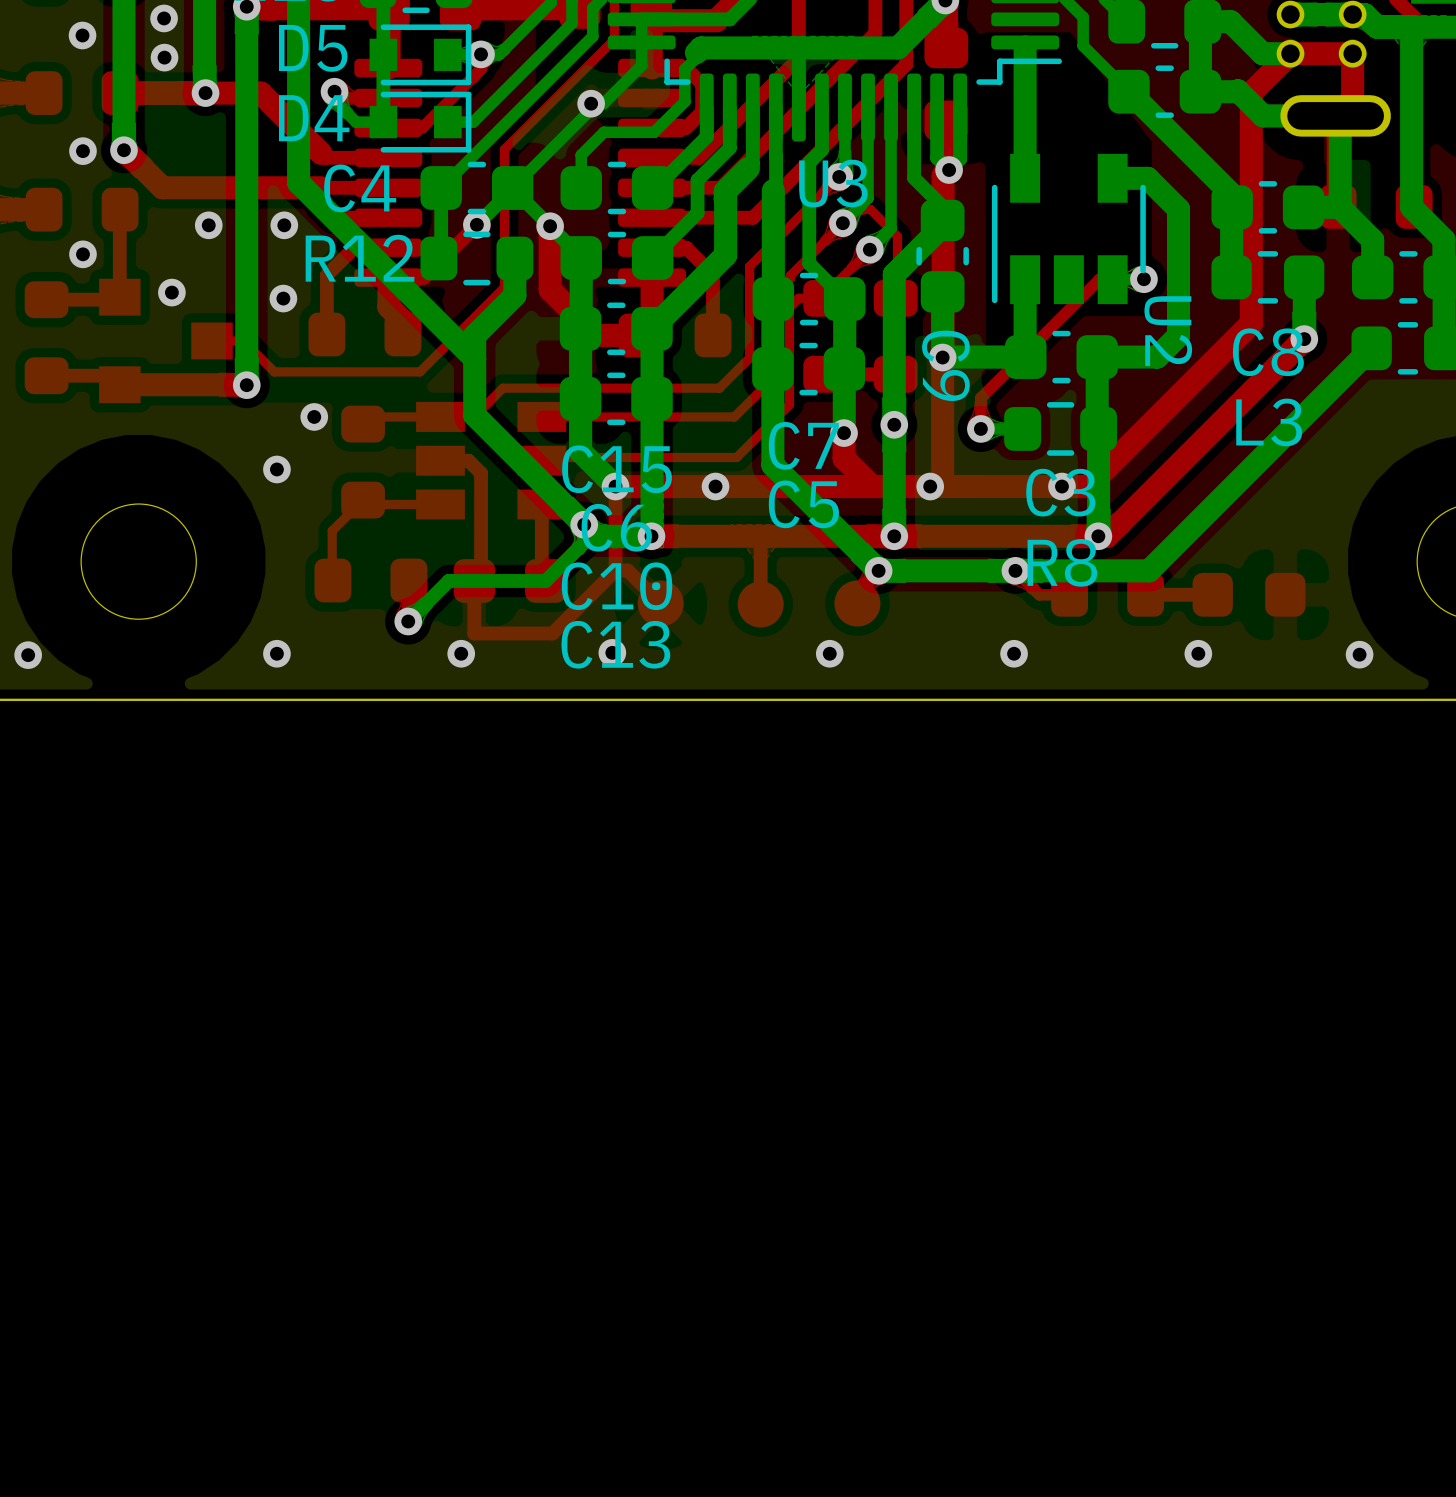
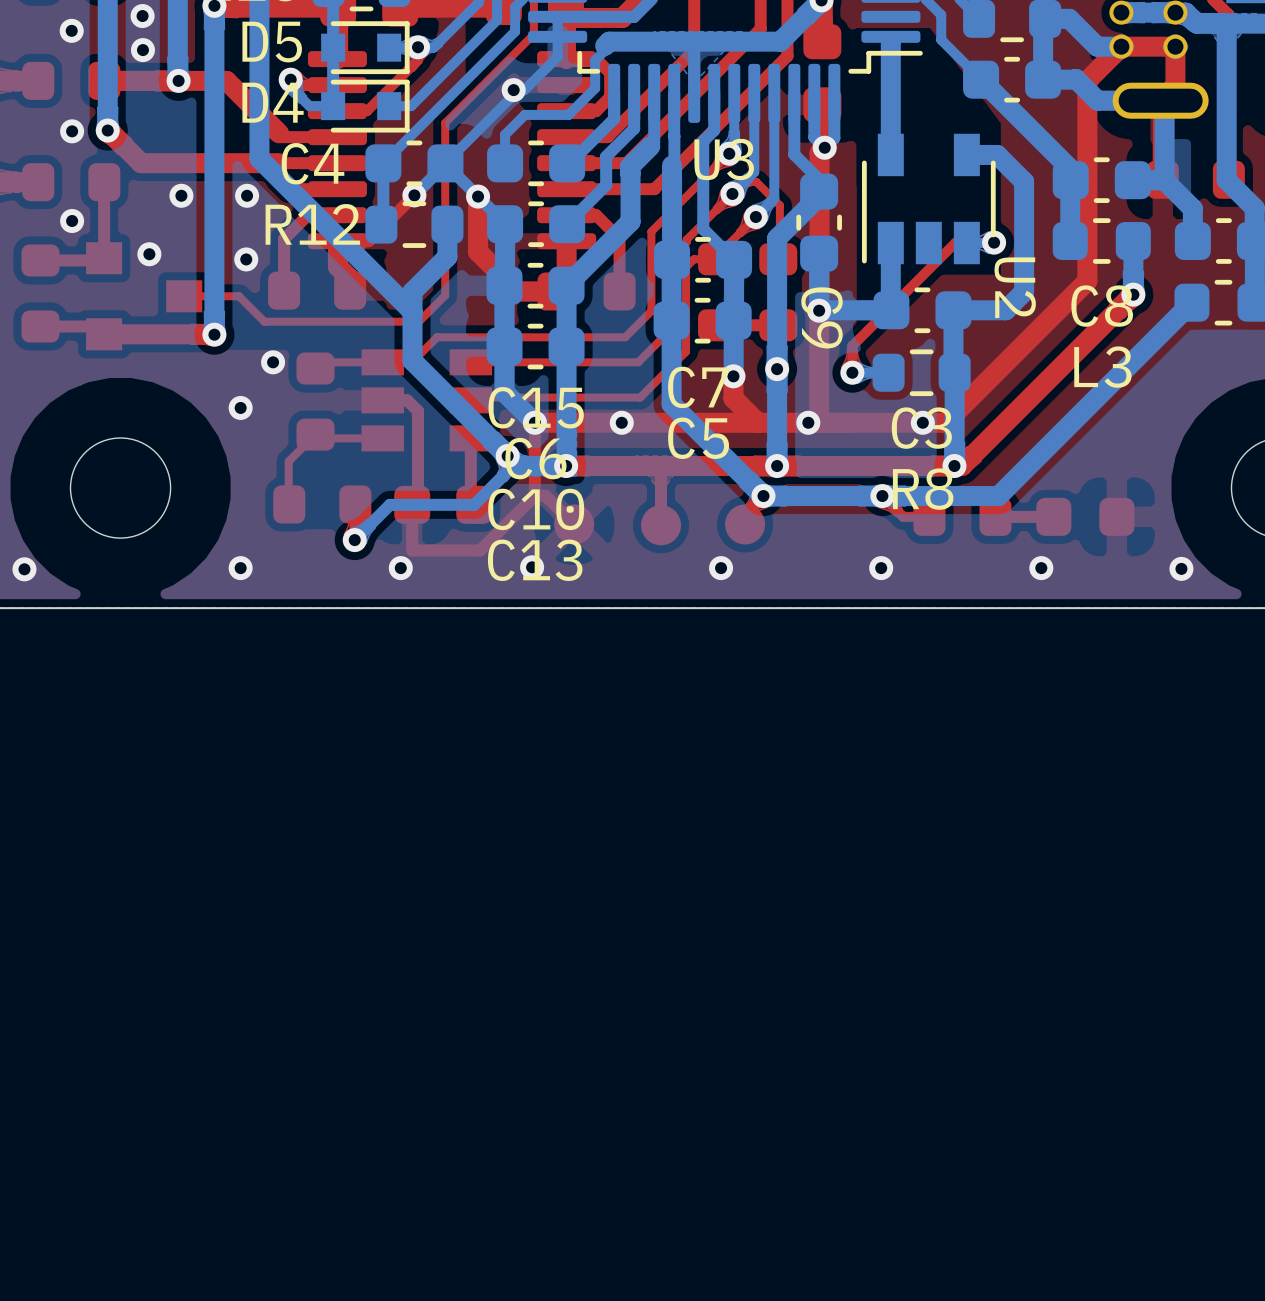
top track: (512, 141) (504, 149) (504, 287) (419, 371) (274, 371) (243, 340) -> (445, 123) (445, 295) (419, 321) (264, 321) (238, 296) (211, 296)

